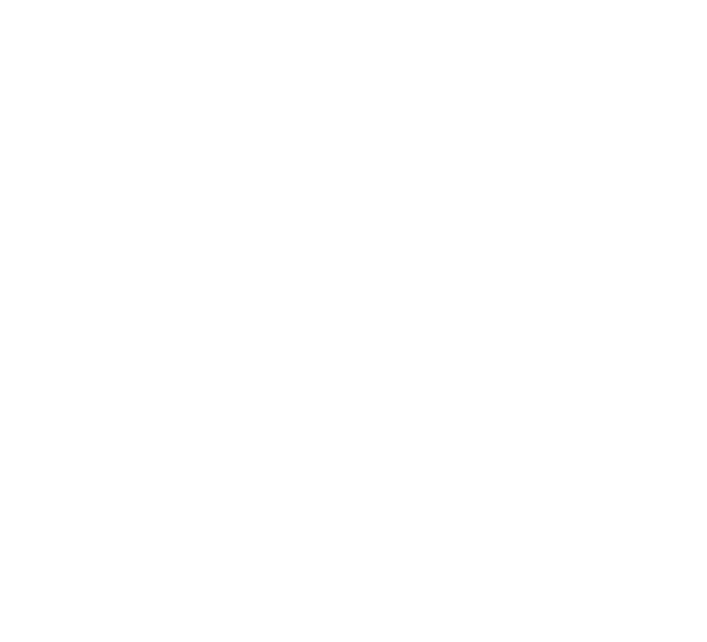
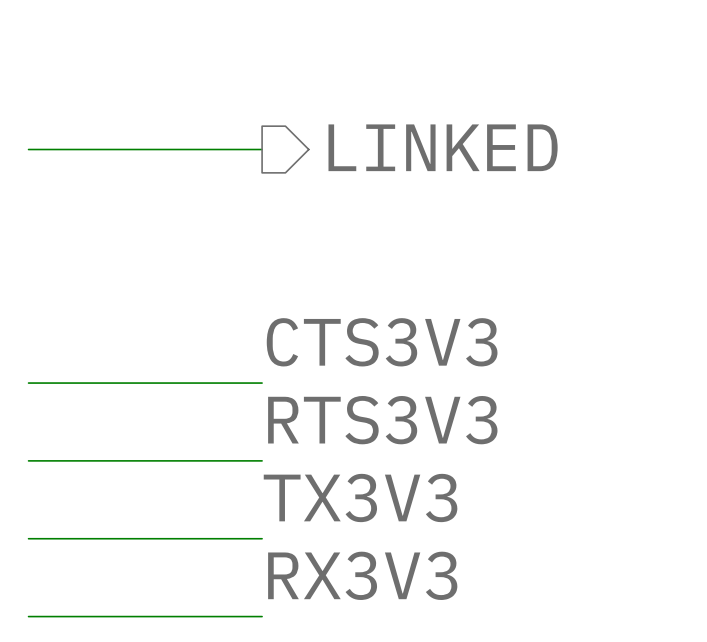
hierarchical label: none -> LINKED (443, 147)
wire: none -> (28, 149) (262, 149)
label: none -> CTS3V3 (382, 342)
wire: none -> (28, 383) (262, 383)
label: none -> RTS3V3 (382, 420)
wire: none -> (28, 460) (262, 460)
label: none -> TX3V3 (360, 497)
wire: none -> (28, 538) (262, 538)
label: none -> RX3V3 (362, 575)
wire: none -> (28, 616) (262, 616)

